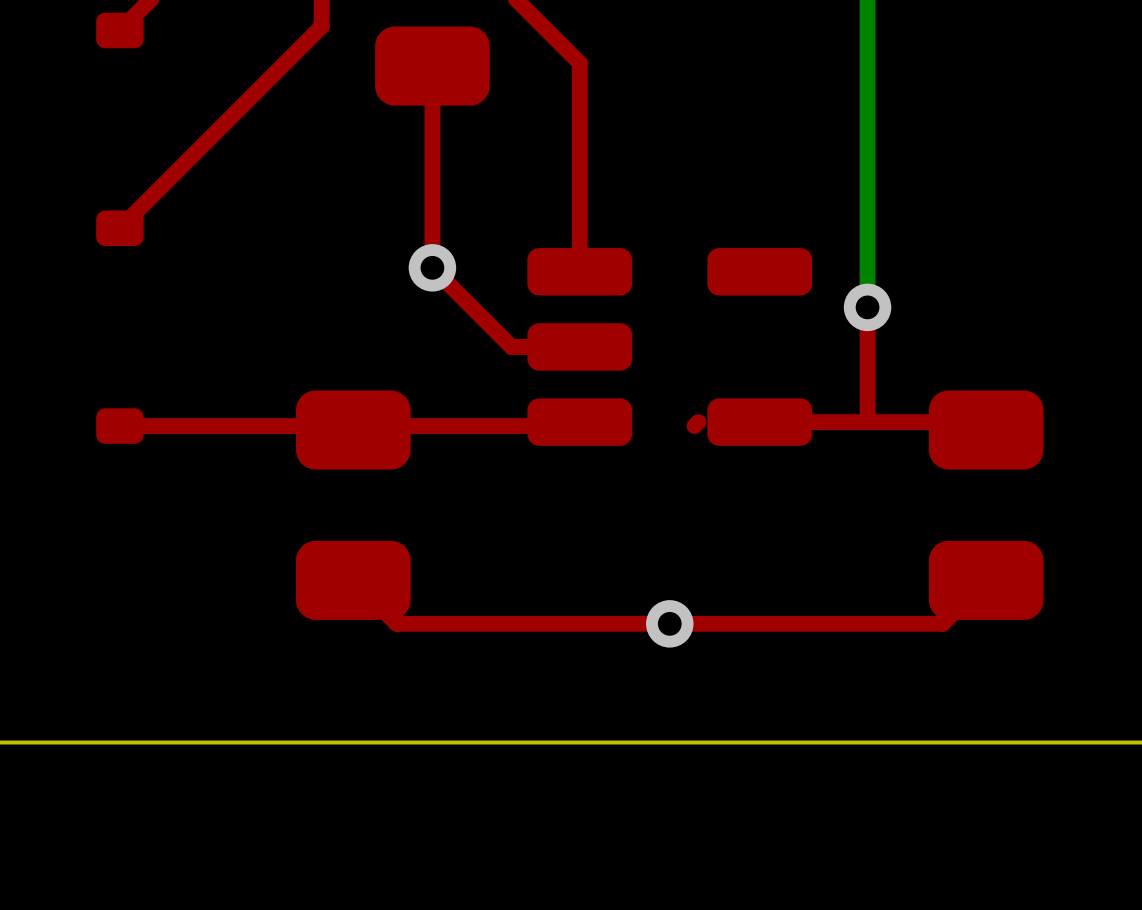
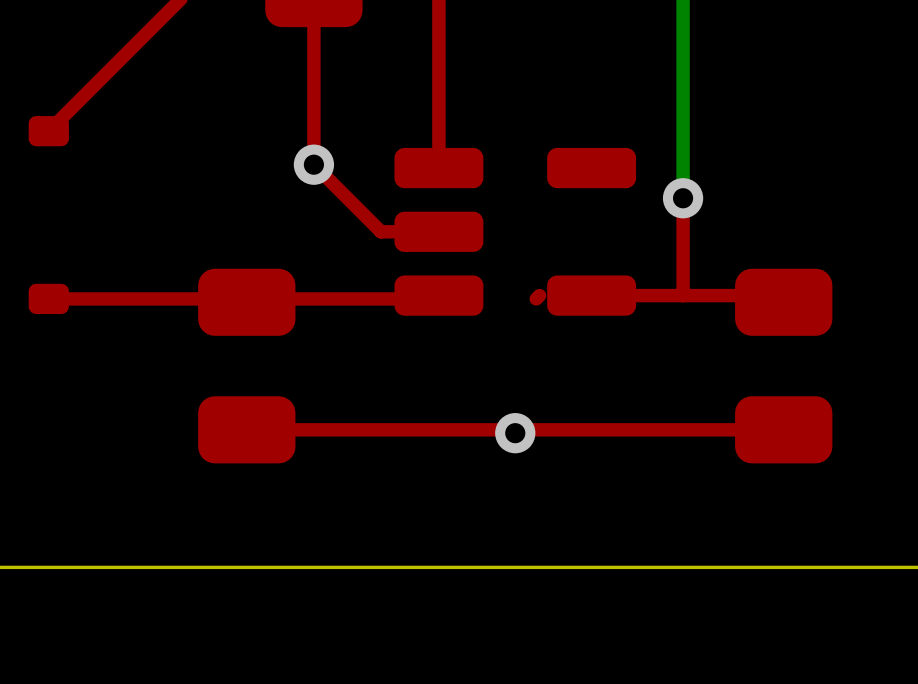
top track: (986, 580) (942, 623) (396, 623) (353, 580) -> (783, 429) (518, 429) (515, 433) (511, 429) (246, 429)
via position: (669, 623) -> (515, 433)

